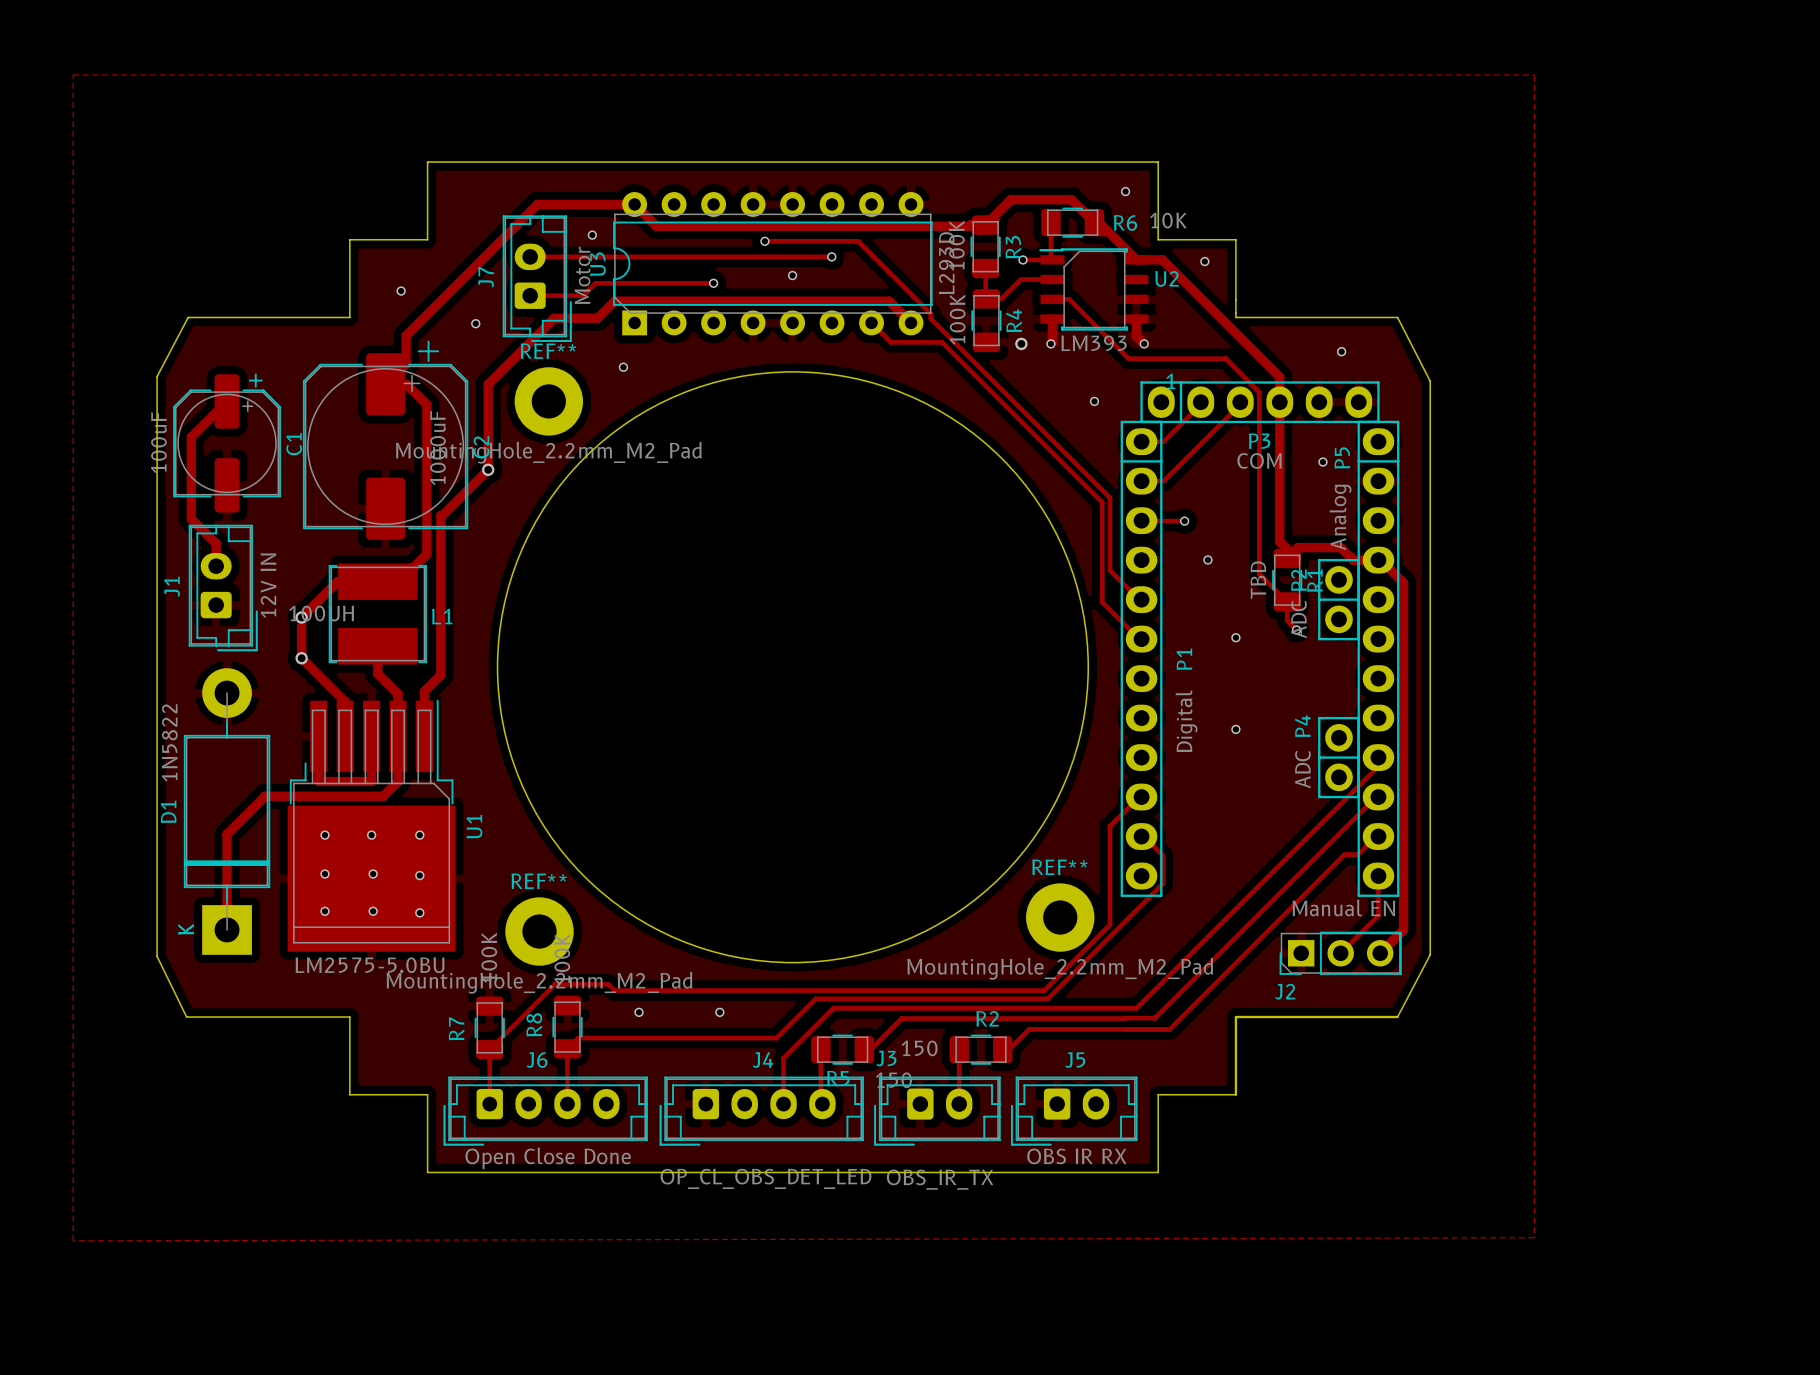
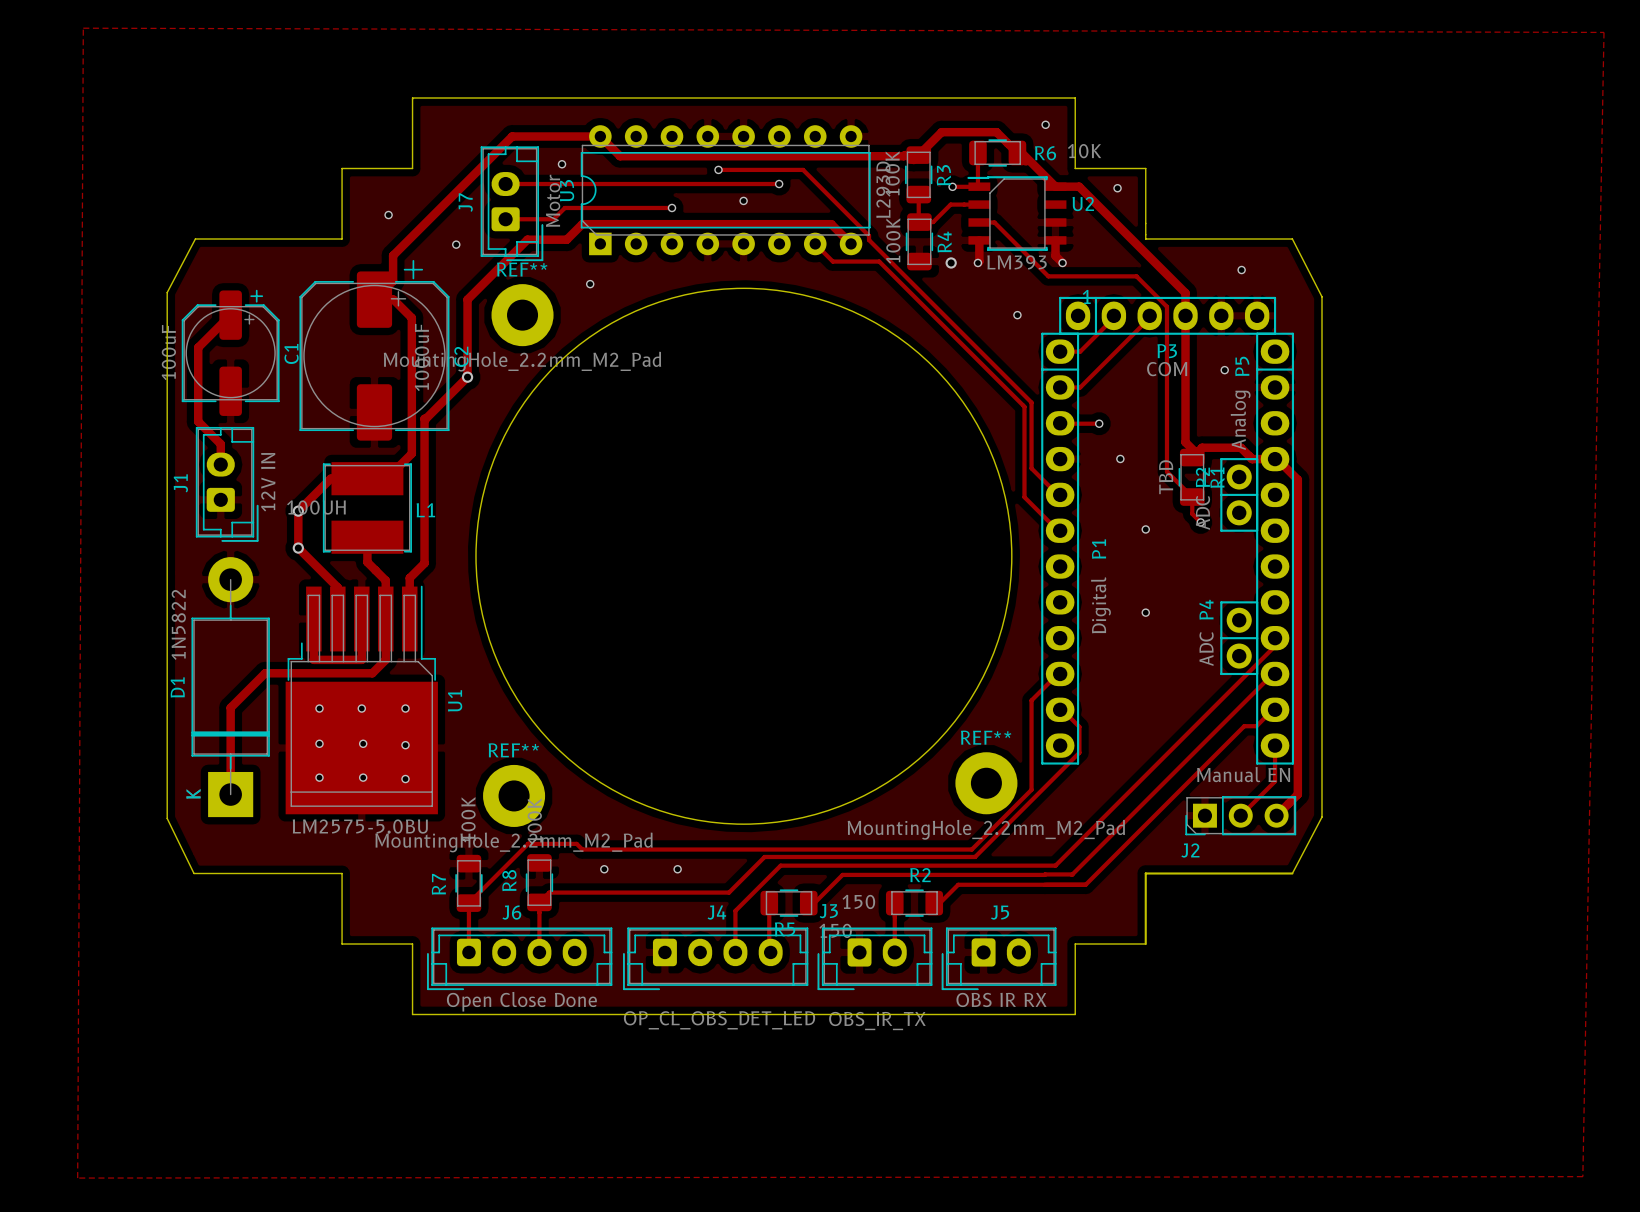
zone outline: (73, 74) (1534, 74) (1534, 1237) (73, 1240) (73, 74) -> (83, 28) (77, 1178) (1582, 1176) (1604, 32) (83, 28)

